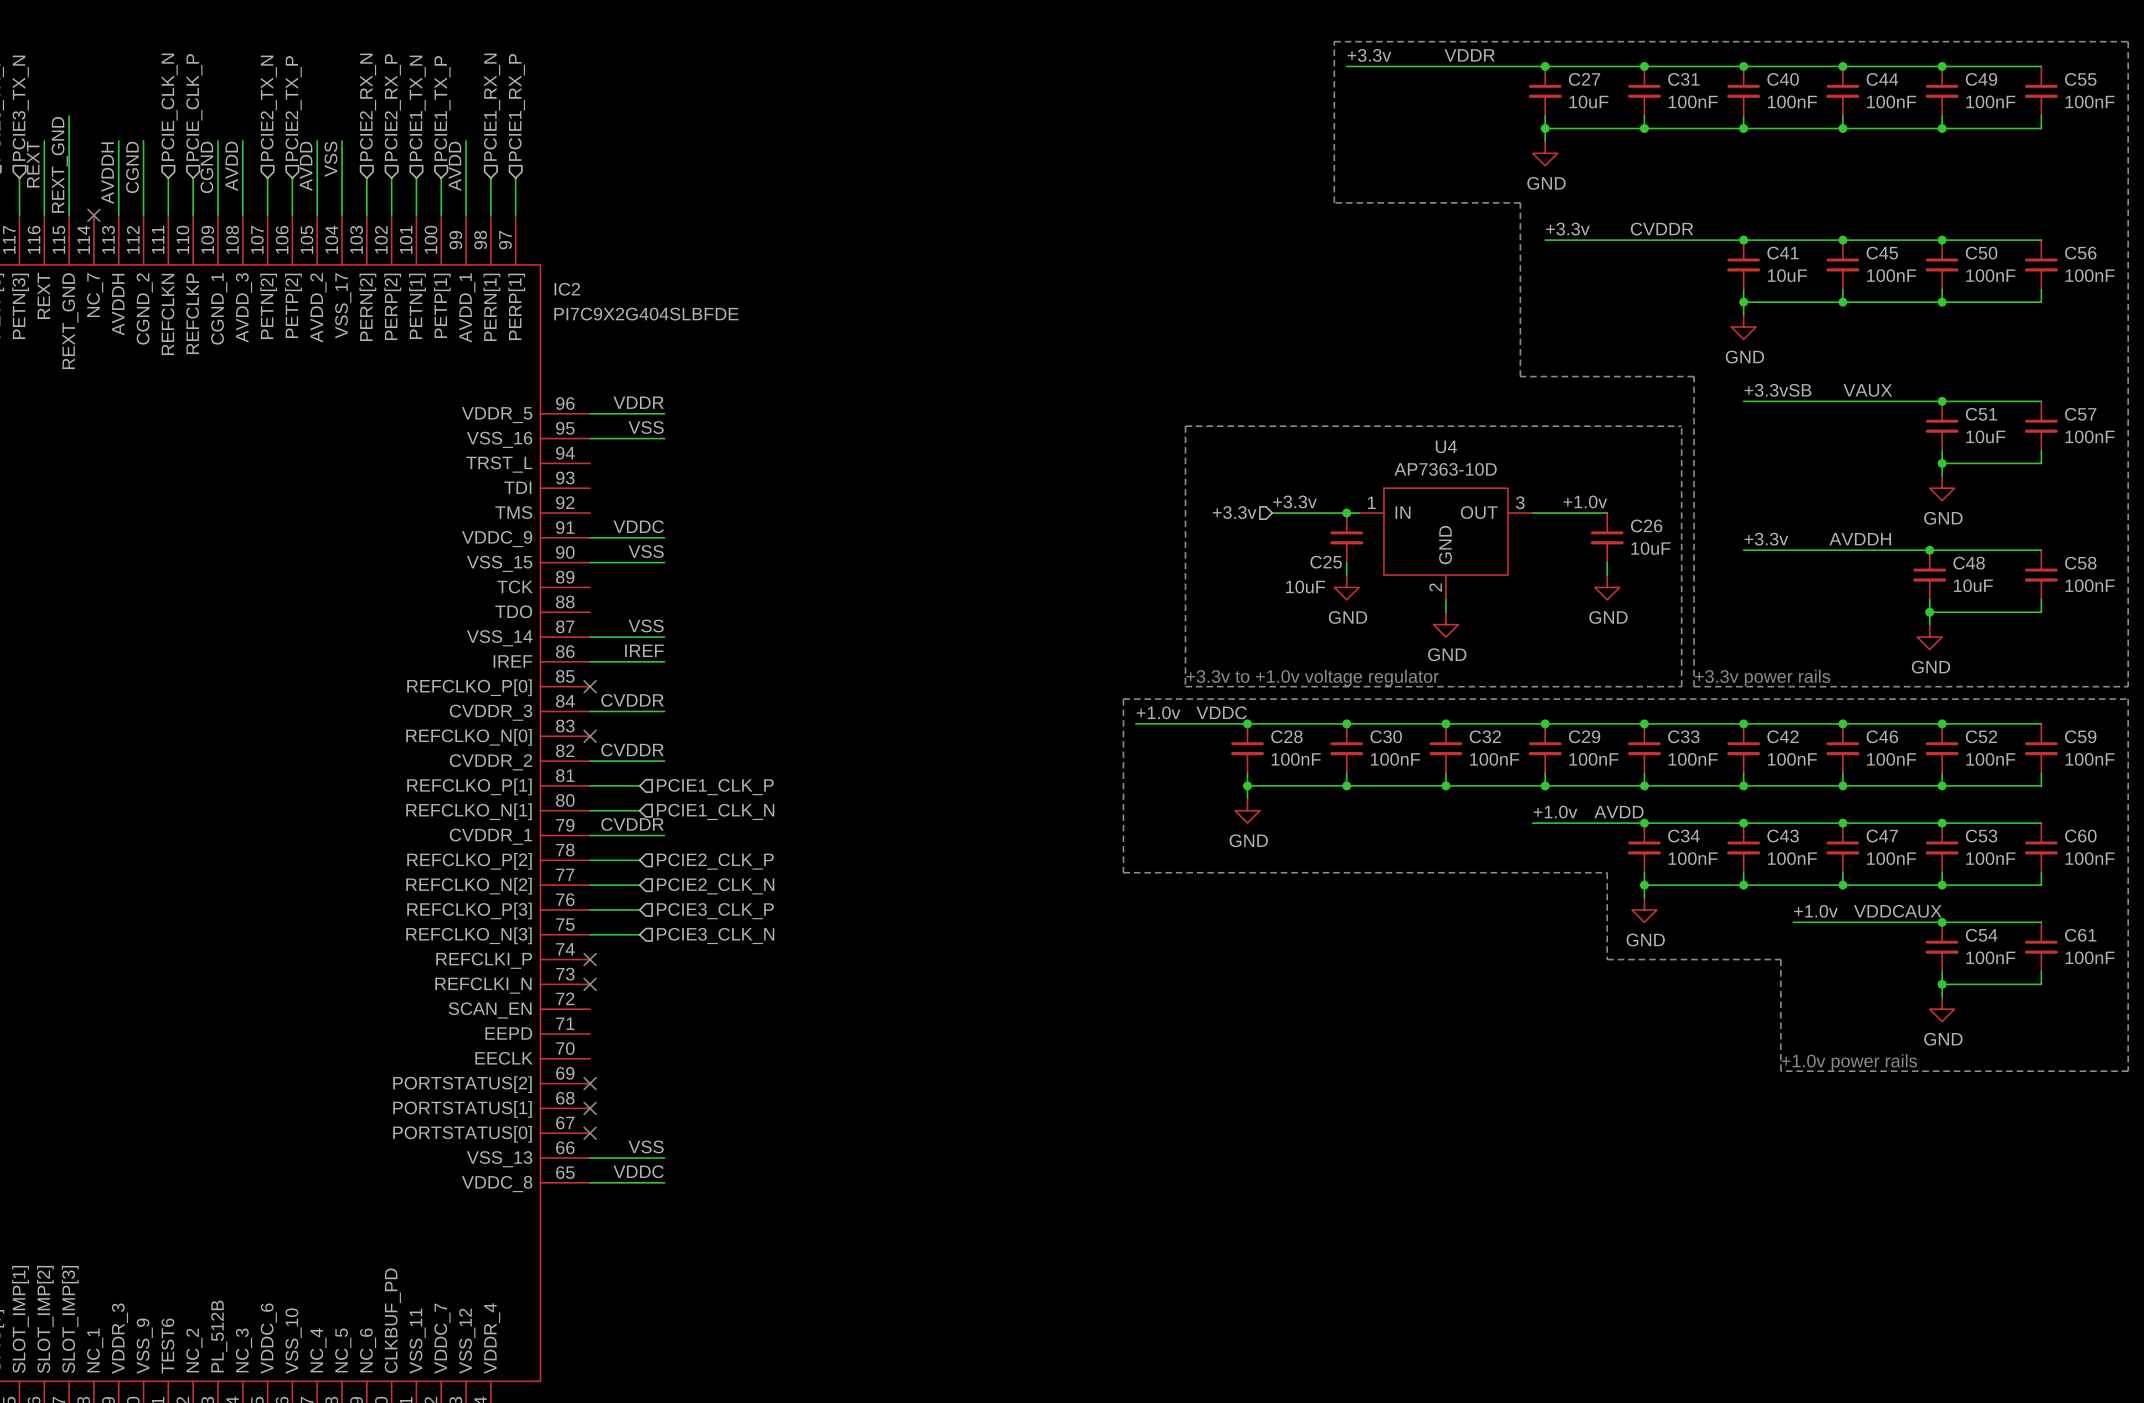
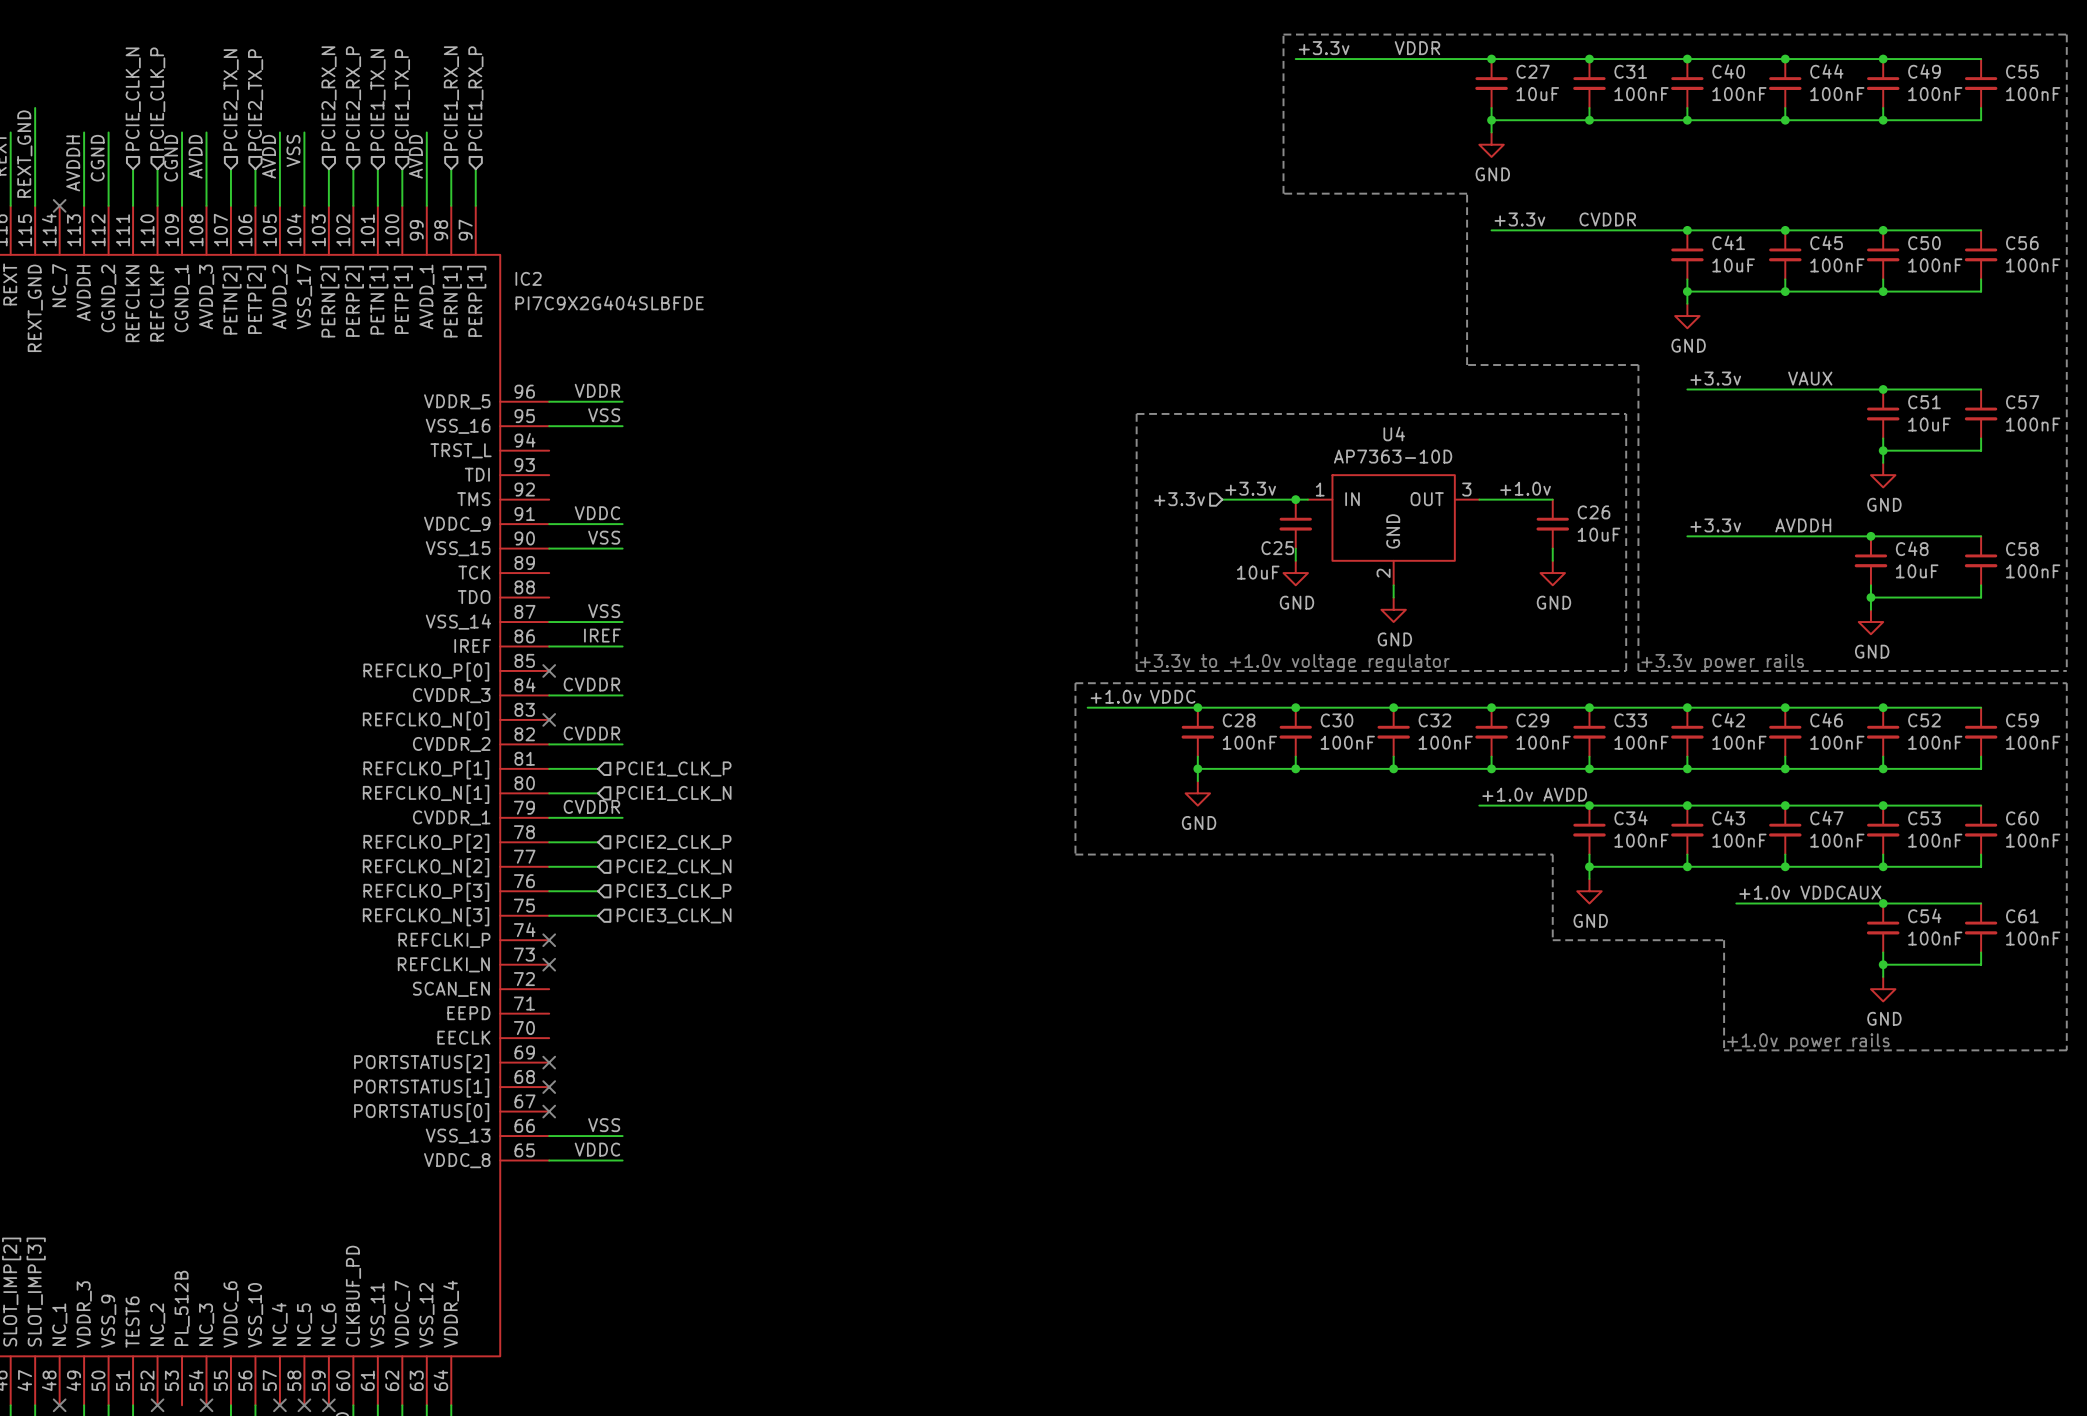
label: +3.3vSB (1777, 390) -> +3.3v (1715, 378)

